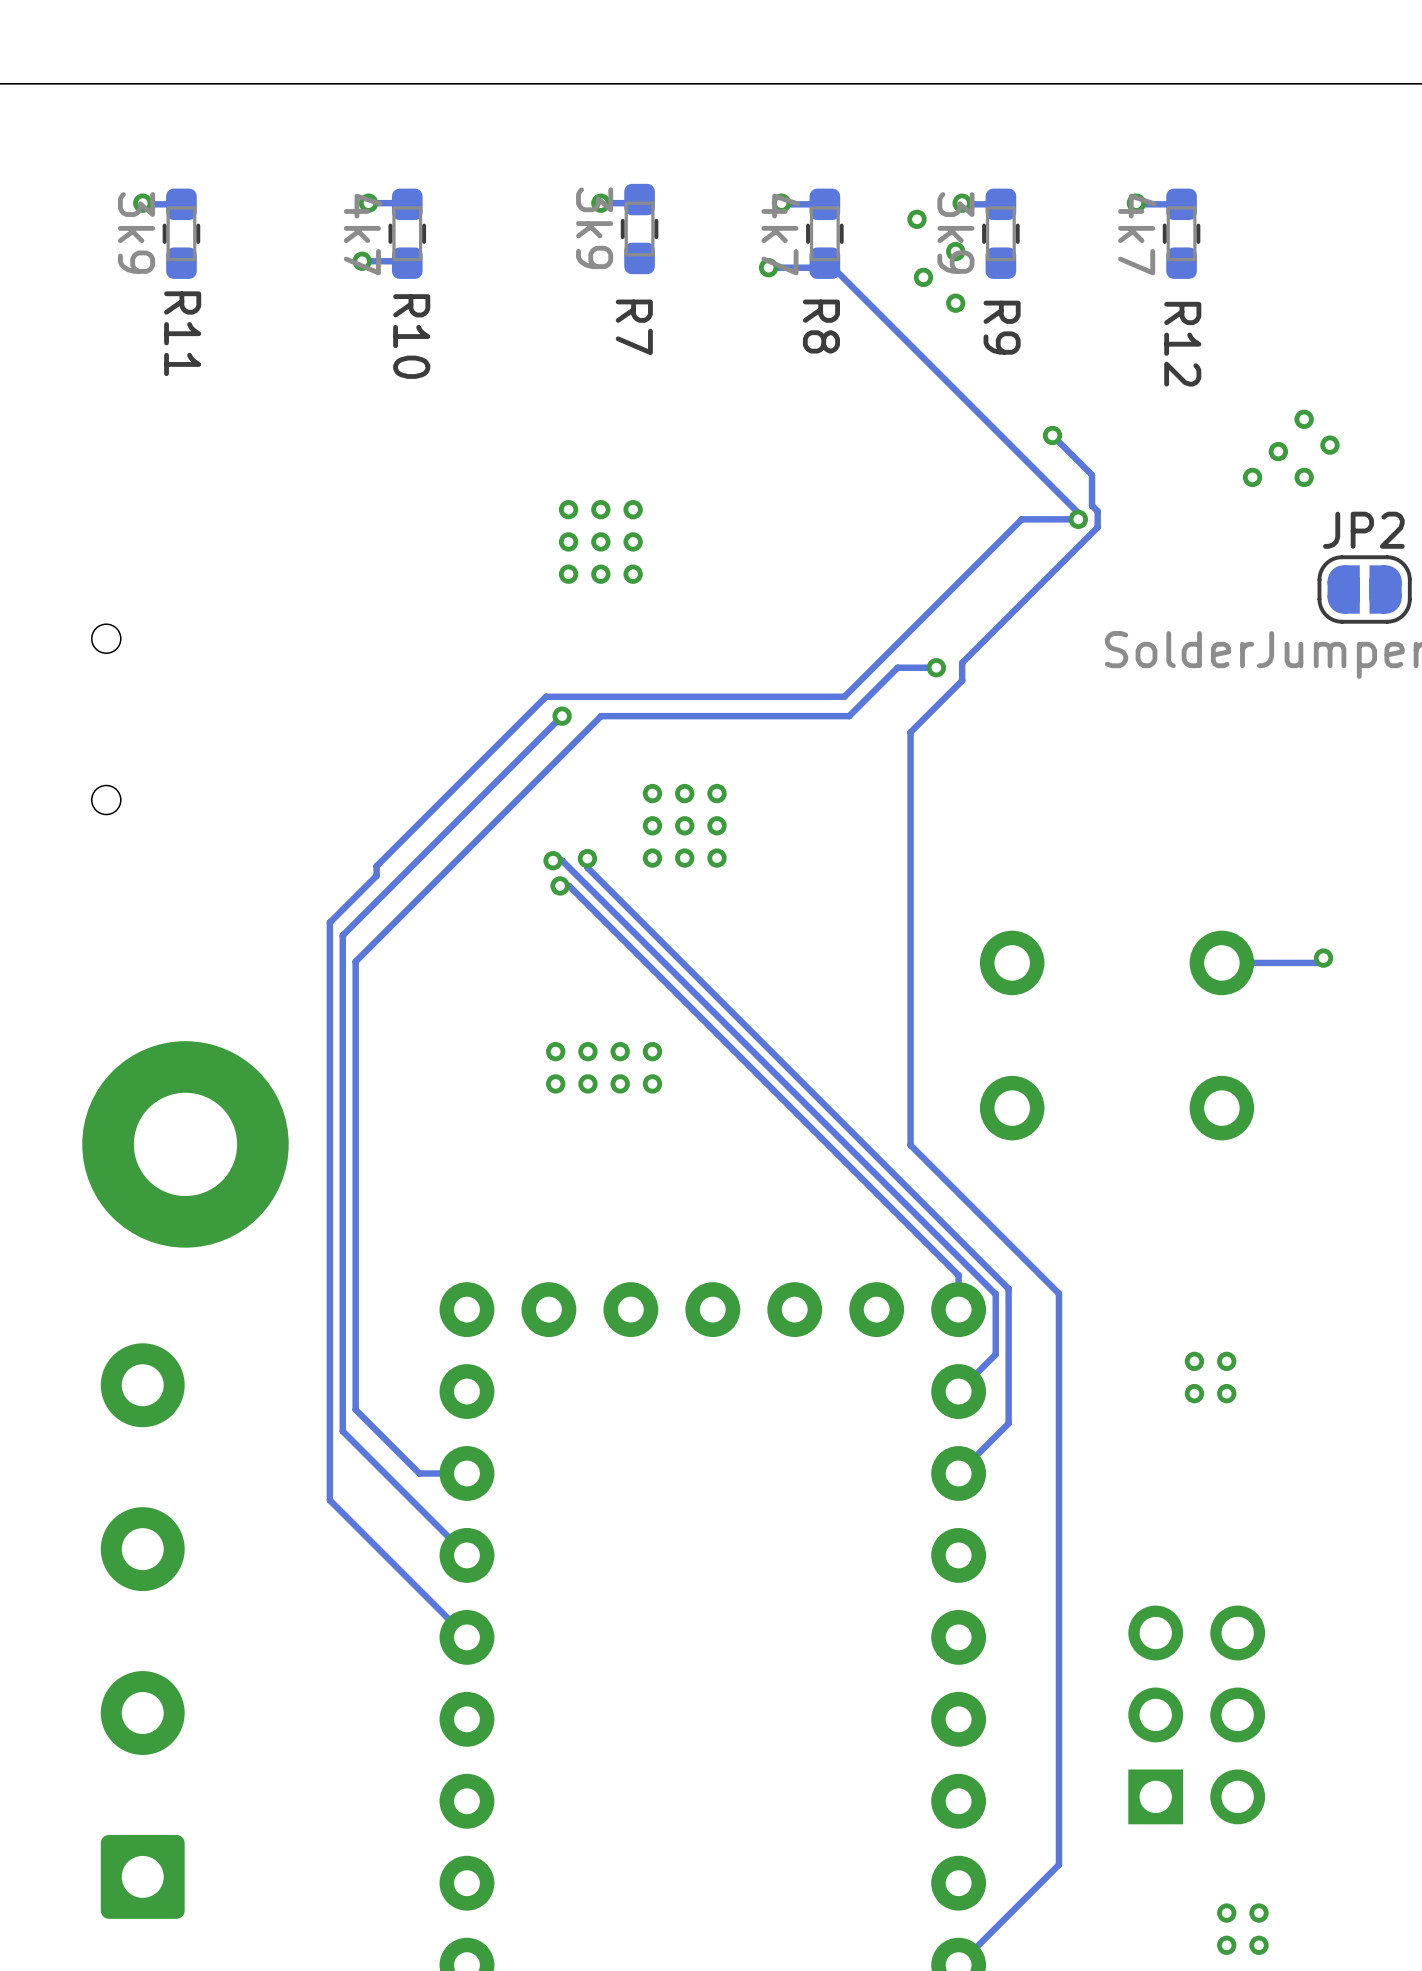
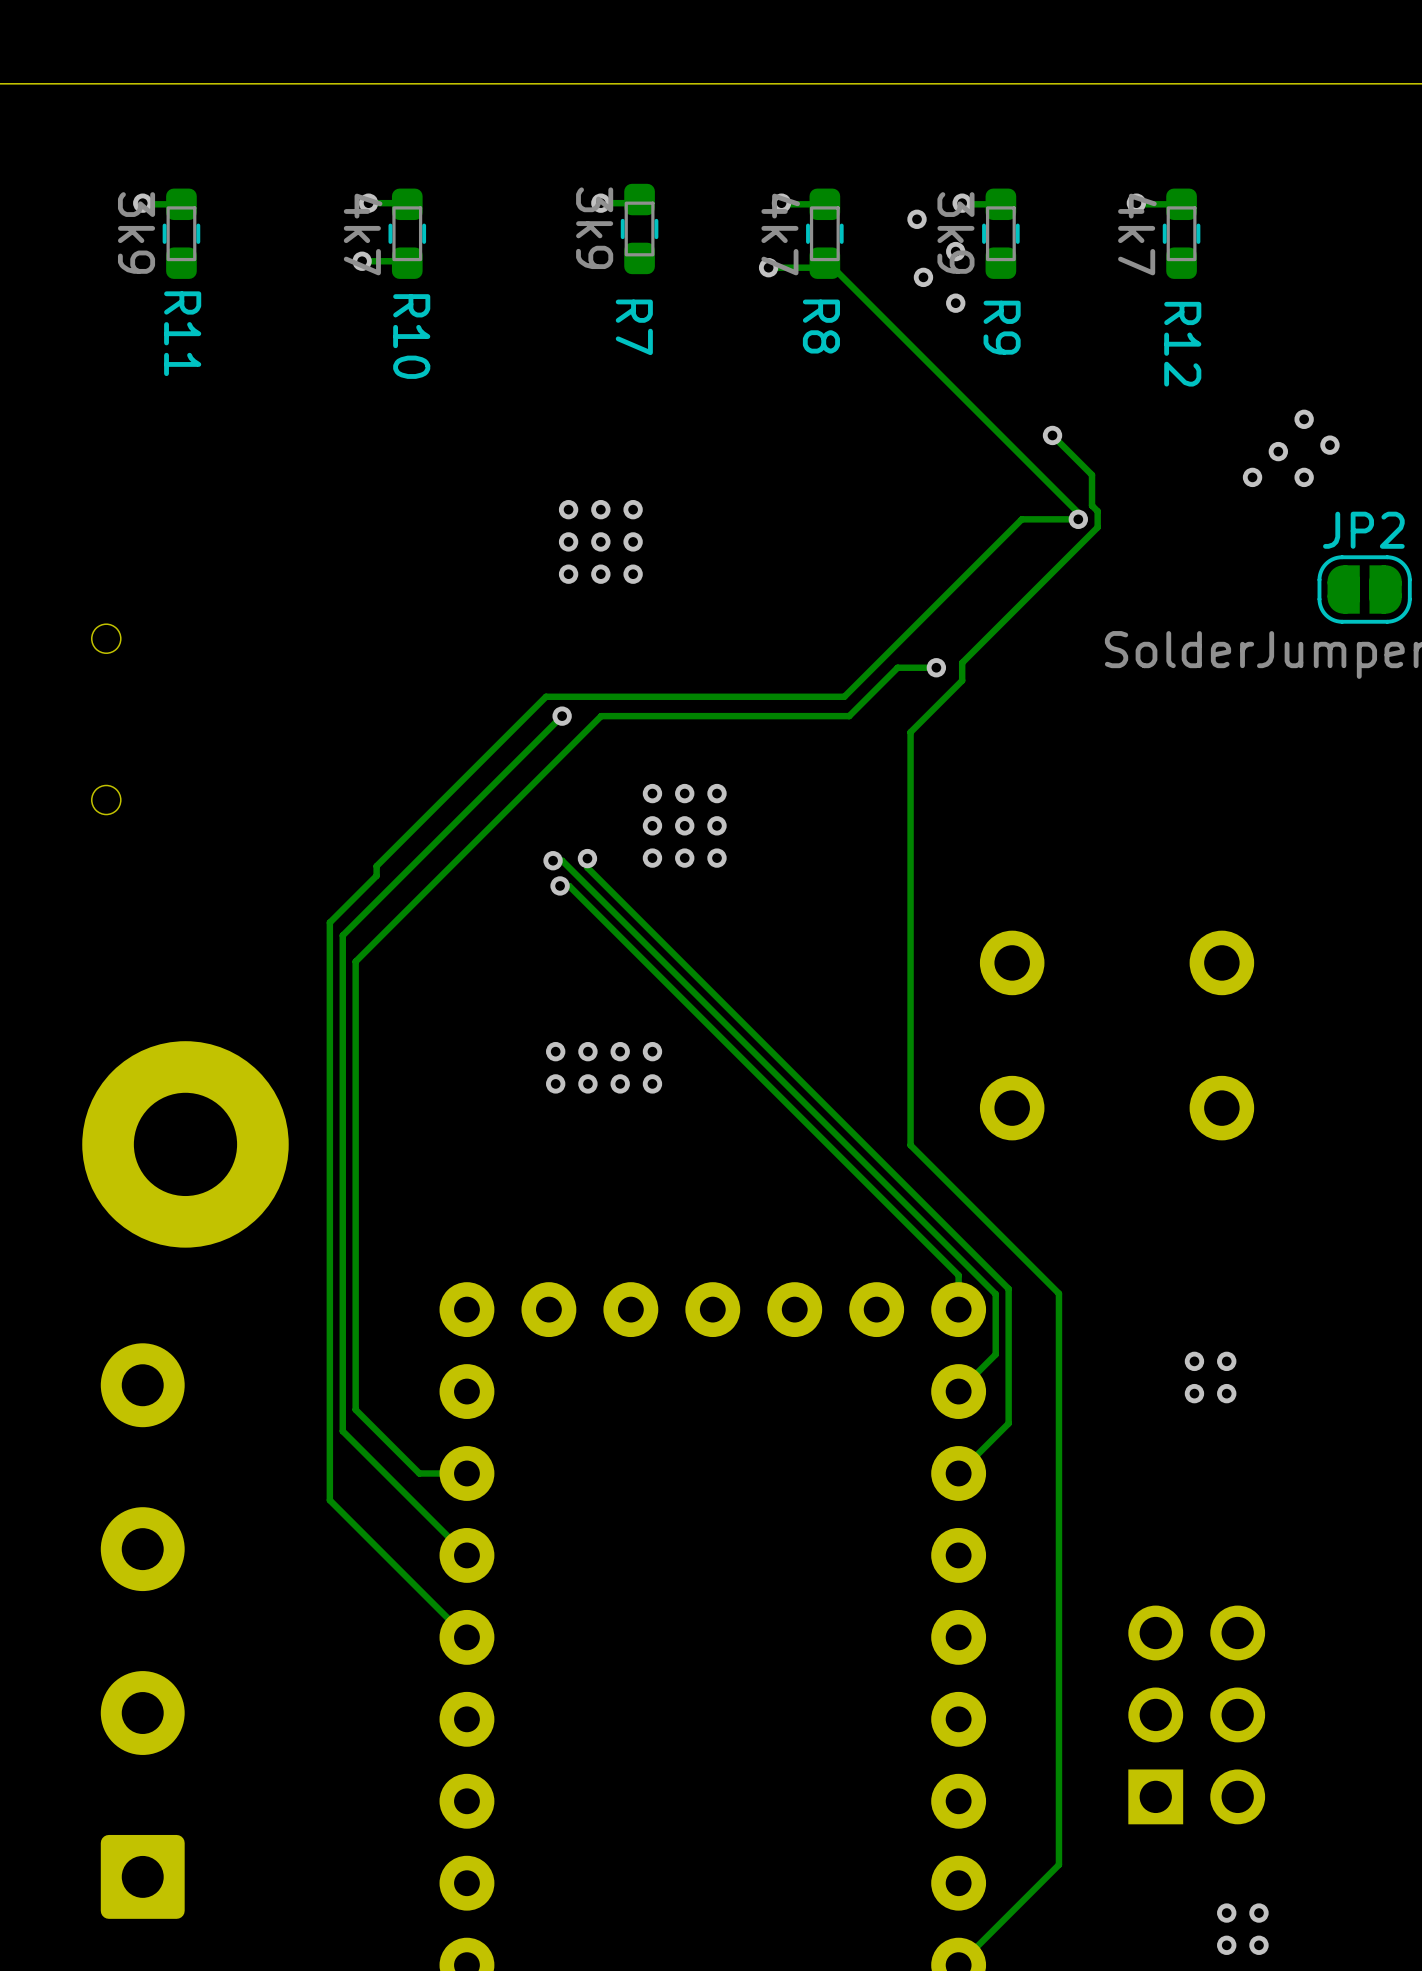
track: (1323, 958) (1318, 962) (1221, 962) -> none
via: (1323, 958) -> none

